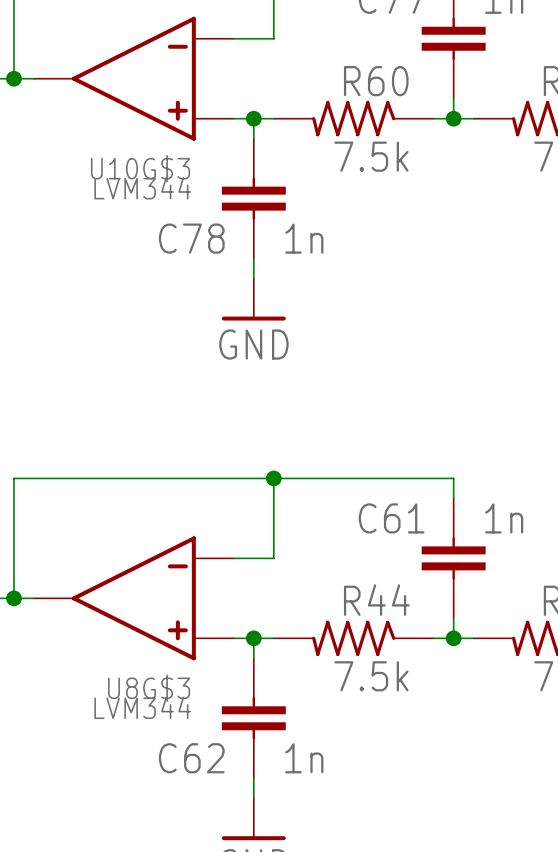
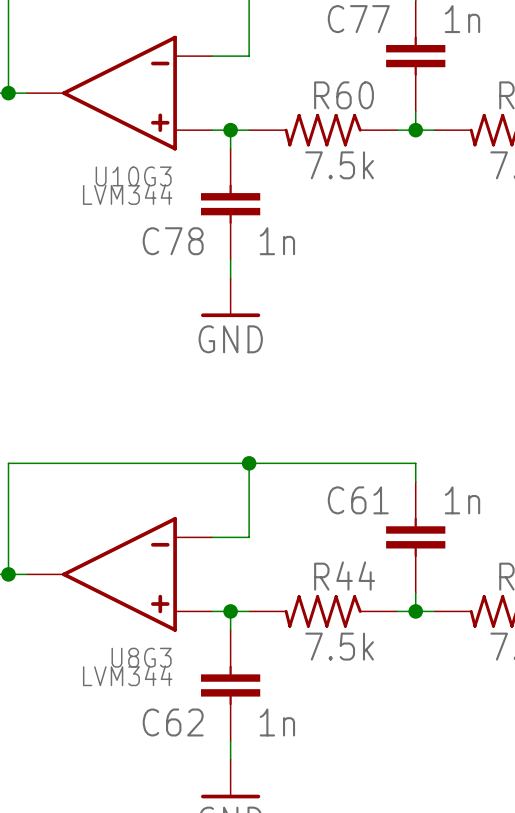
U10G$3 name: U10G$3 (140, 168) -> U10G3 (133, 176)
U8G$3 name: U8G$3 (149, 688) -> U8G3 (141, 657)

